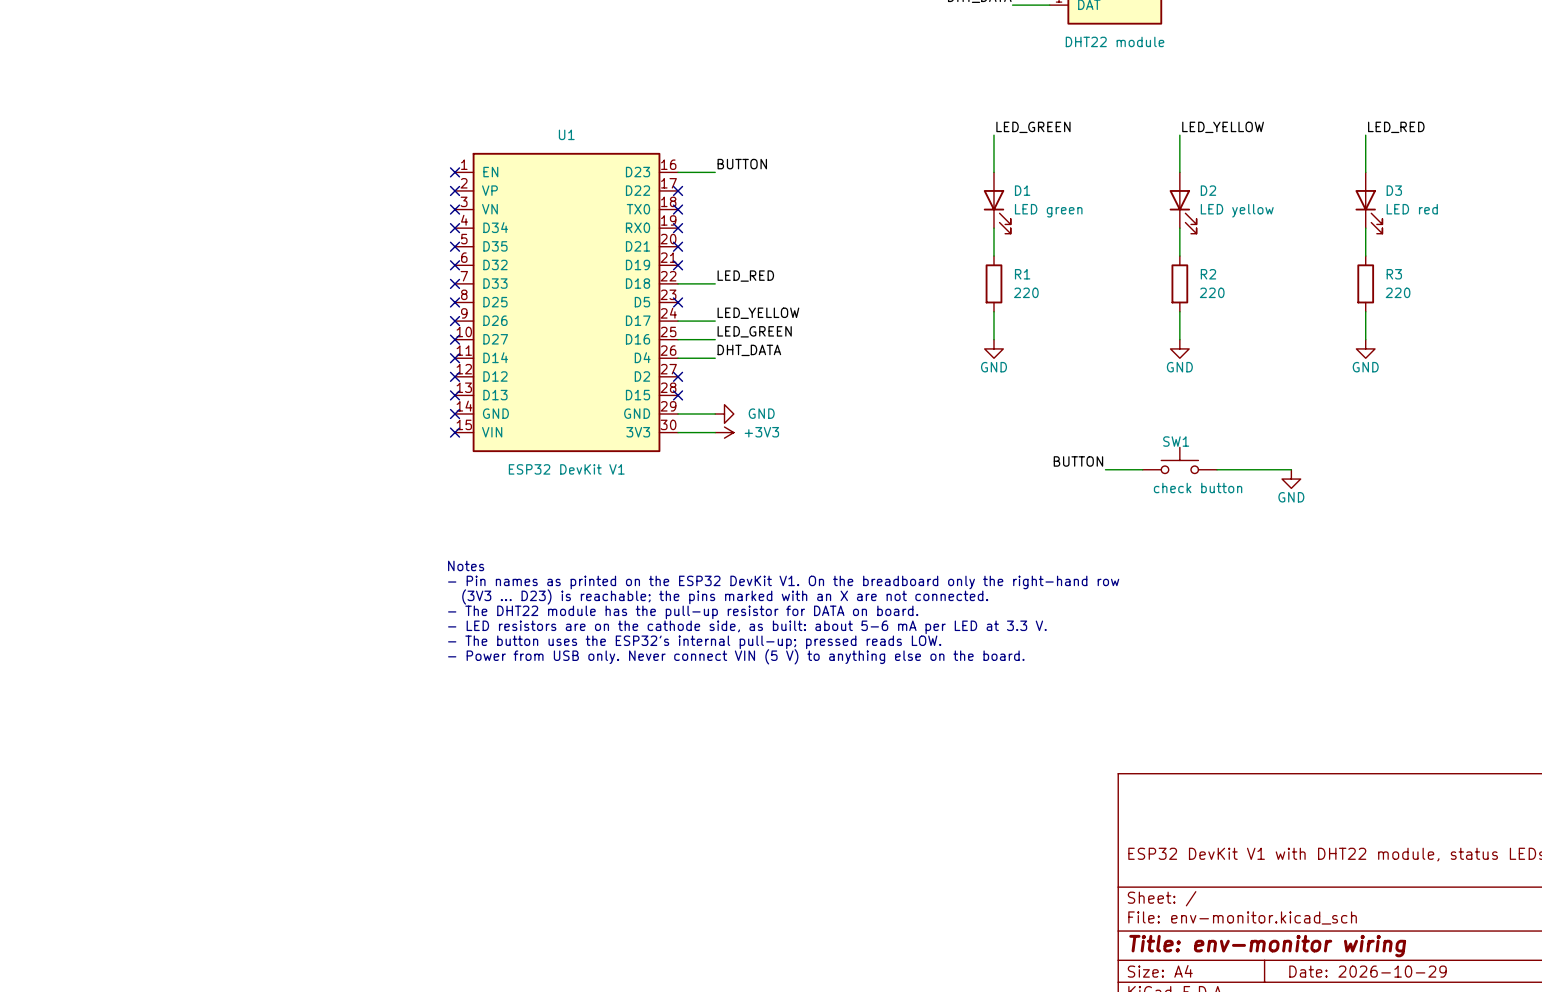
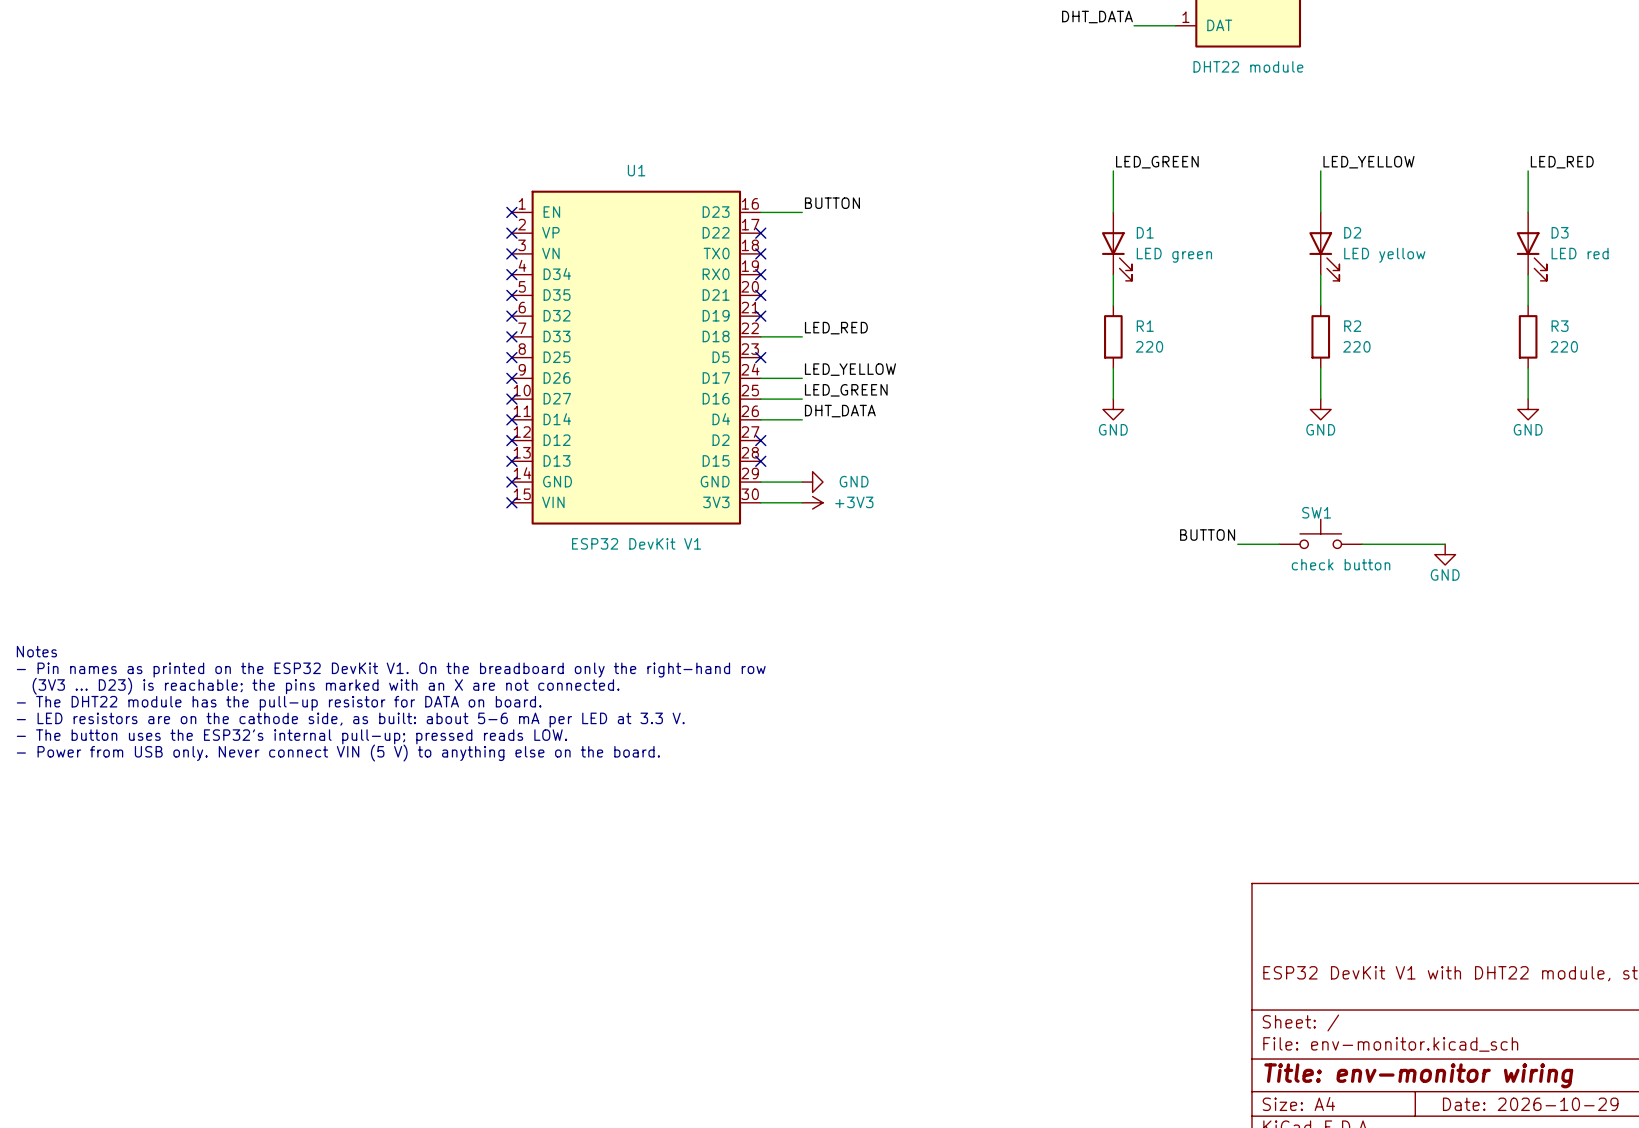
text: none -> Notes (36, 651)
text: Notes (466, 565) -> none
text: none -> - Pin names as printed on the ESP32 DevKit V1. On the breadboard only the right-hand row (391, 670)
text: - Pin names as printed on the ESP32 DevKit V1. On the breadboard only the right-hand row (783, 582) -> none
text: none -> (3V3 ... D23) is reachable; the pins marked with an X are not connected. (326, 686)
text: (3V3 ... D23) is reachable; the pins marked with an X are not connected. (725, 596) -> none
text: none -> - The DHT22 module has the pull-up resistor for DATA on board. (279, 703)
text: - The DHT22 module has the pull-up resistor for DATA on board. (683, 612) -> none
text: none -> - LED resistors are on the cathode side, as built: about 5-6 mA per LED at 3.3 V. (350, 720)
text: - LED resistors are on the cathode side, as built: about 5-6 mA per LED at 3.3 V. (747, 627) -> none
text: none -> - The button uses the ESP32's internal pull-up; pressed reads LOW. (291, 736)
text: - The button uses the ESP32's internal pull-up; pressed reads LOW. (694, 642) -> none
text: none -> - Power from USB only. Never connect VIN (5 V) to anything else on the board. (338, 753)
text: - Power from USB only. Never connect VIN (5 V) to anything else on the board. (736, 656) -> none

